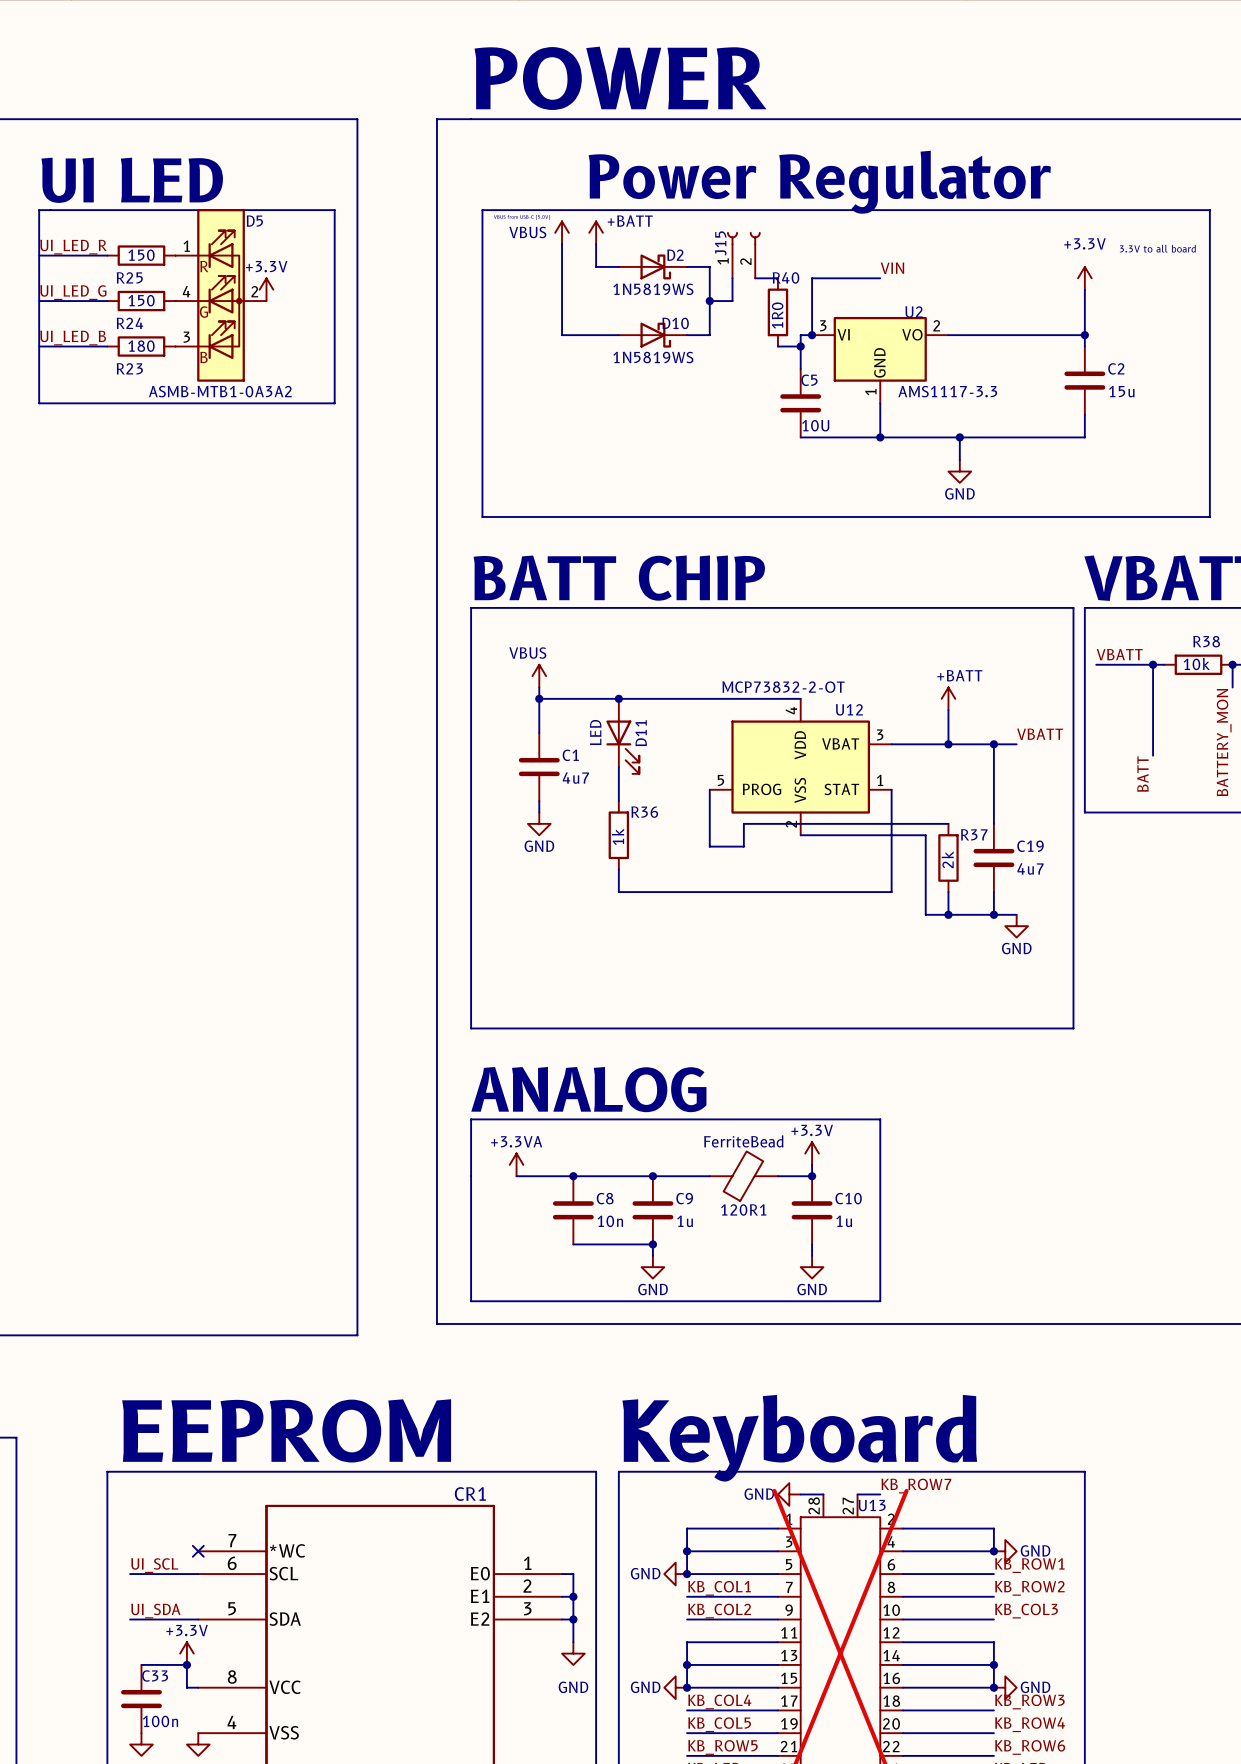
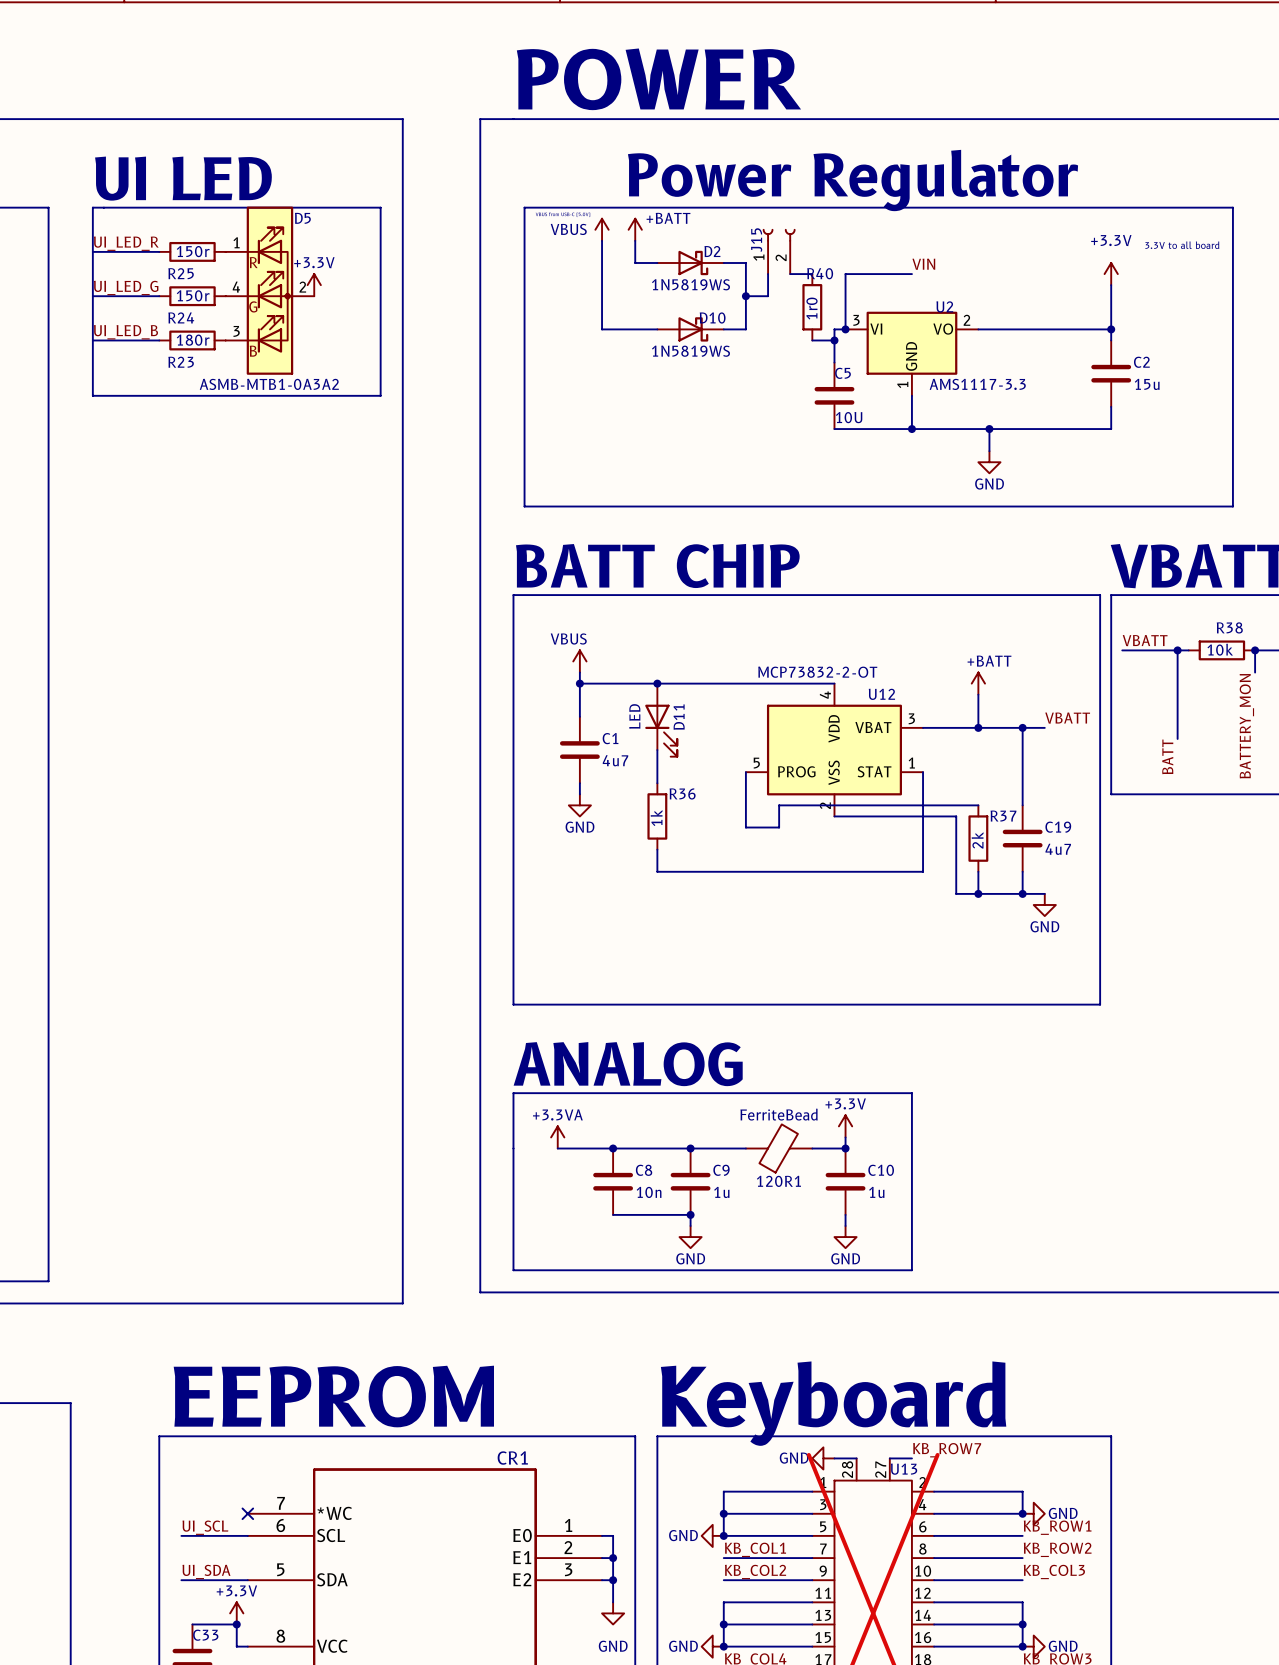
R25 value: 150 (141, 255) -> 150r (193, 251)
R24 value: 150 (141, 300) -> 150r (193, 295)
R40 value: 1R0 (777, 315) -> 1r0 (811, 308)
R23 value: 180 (141, 346) -> 180r (193, 340)

